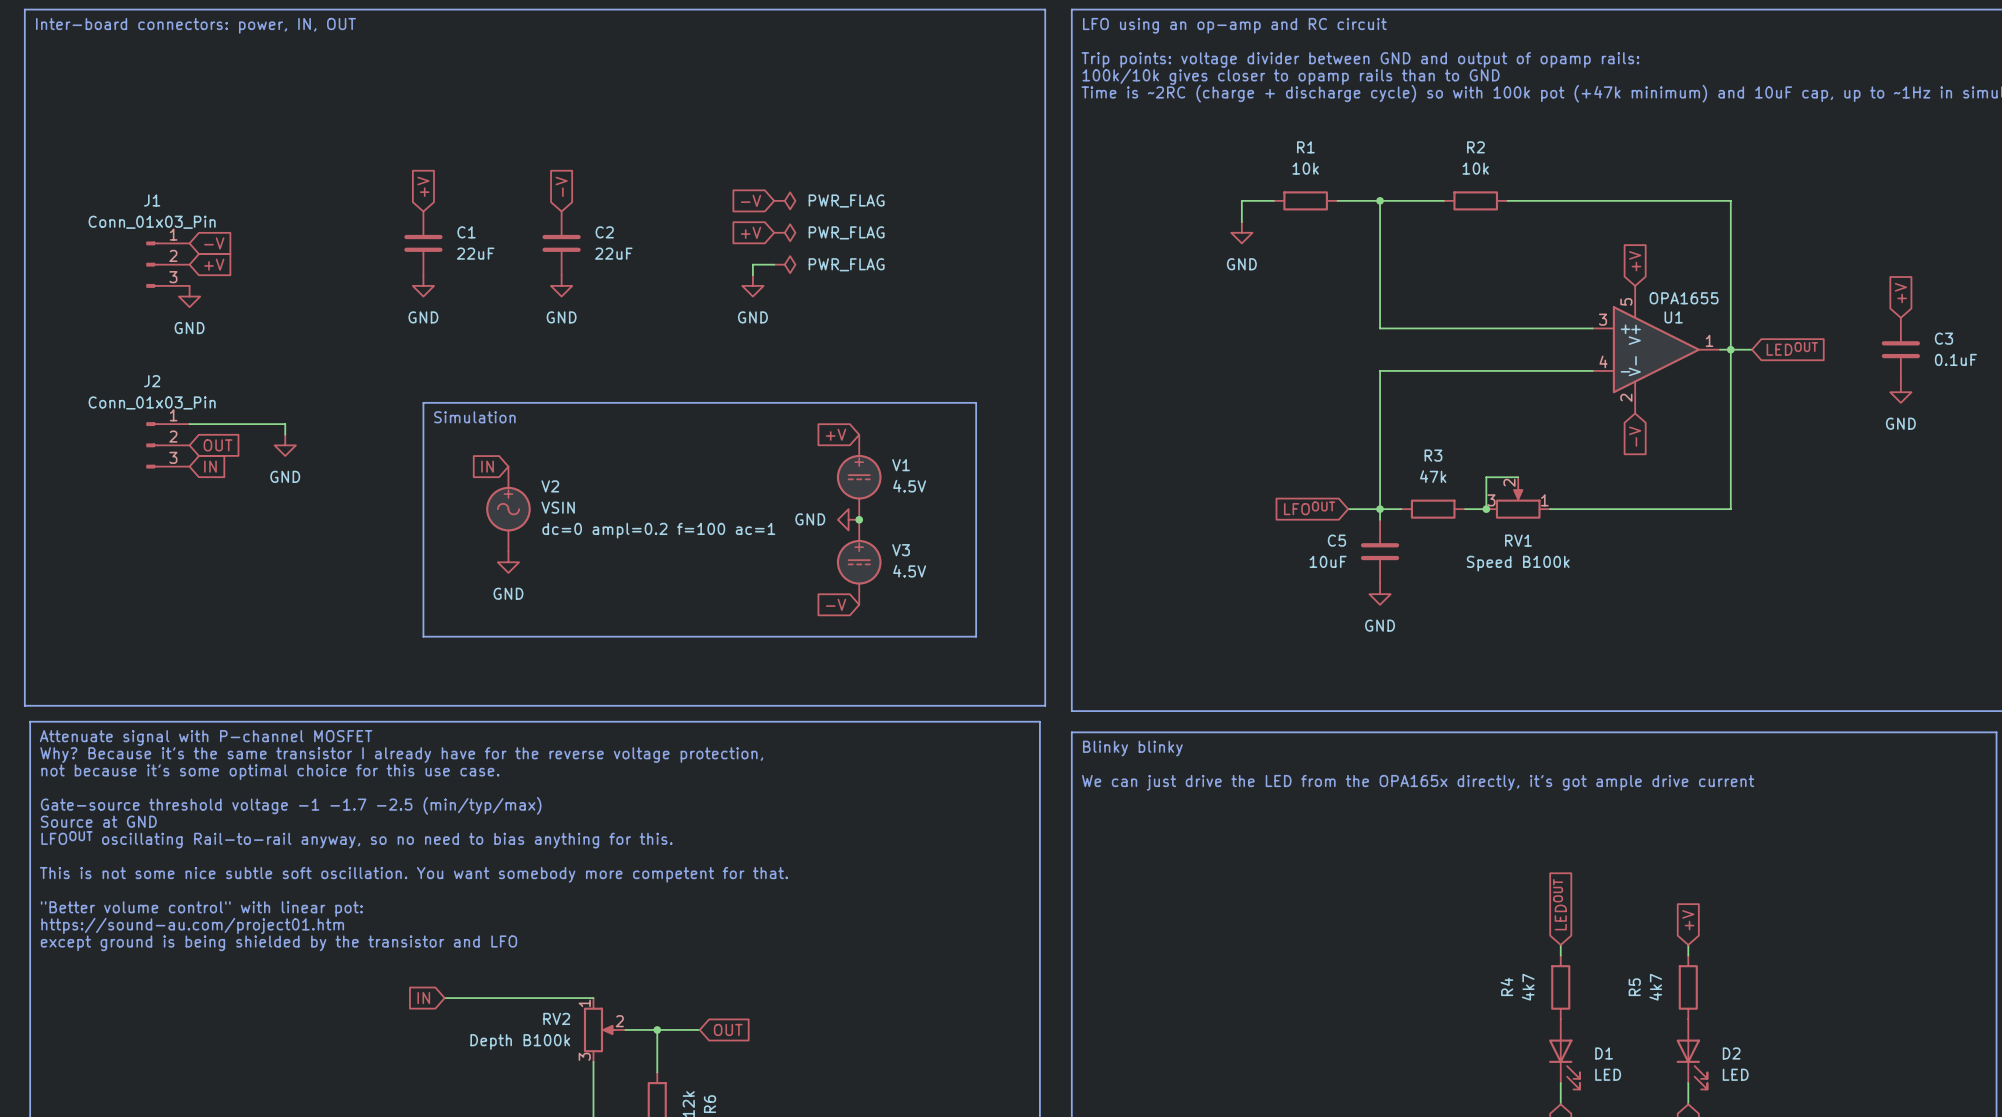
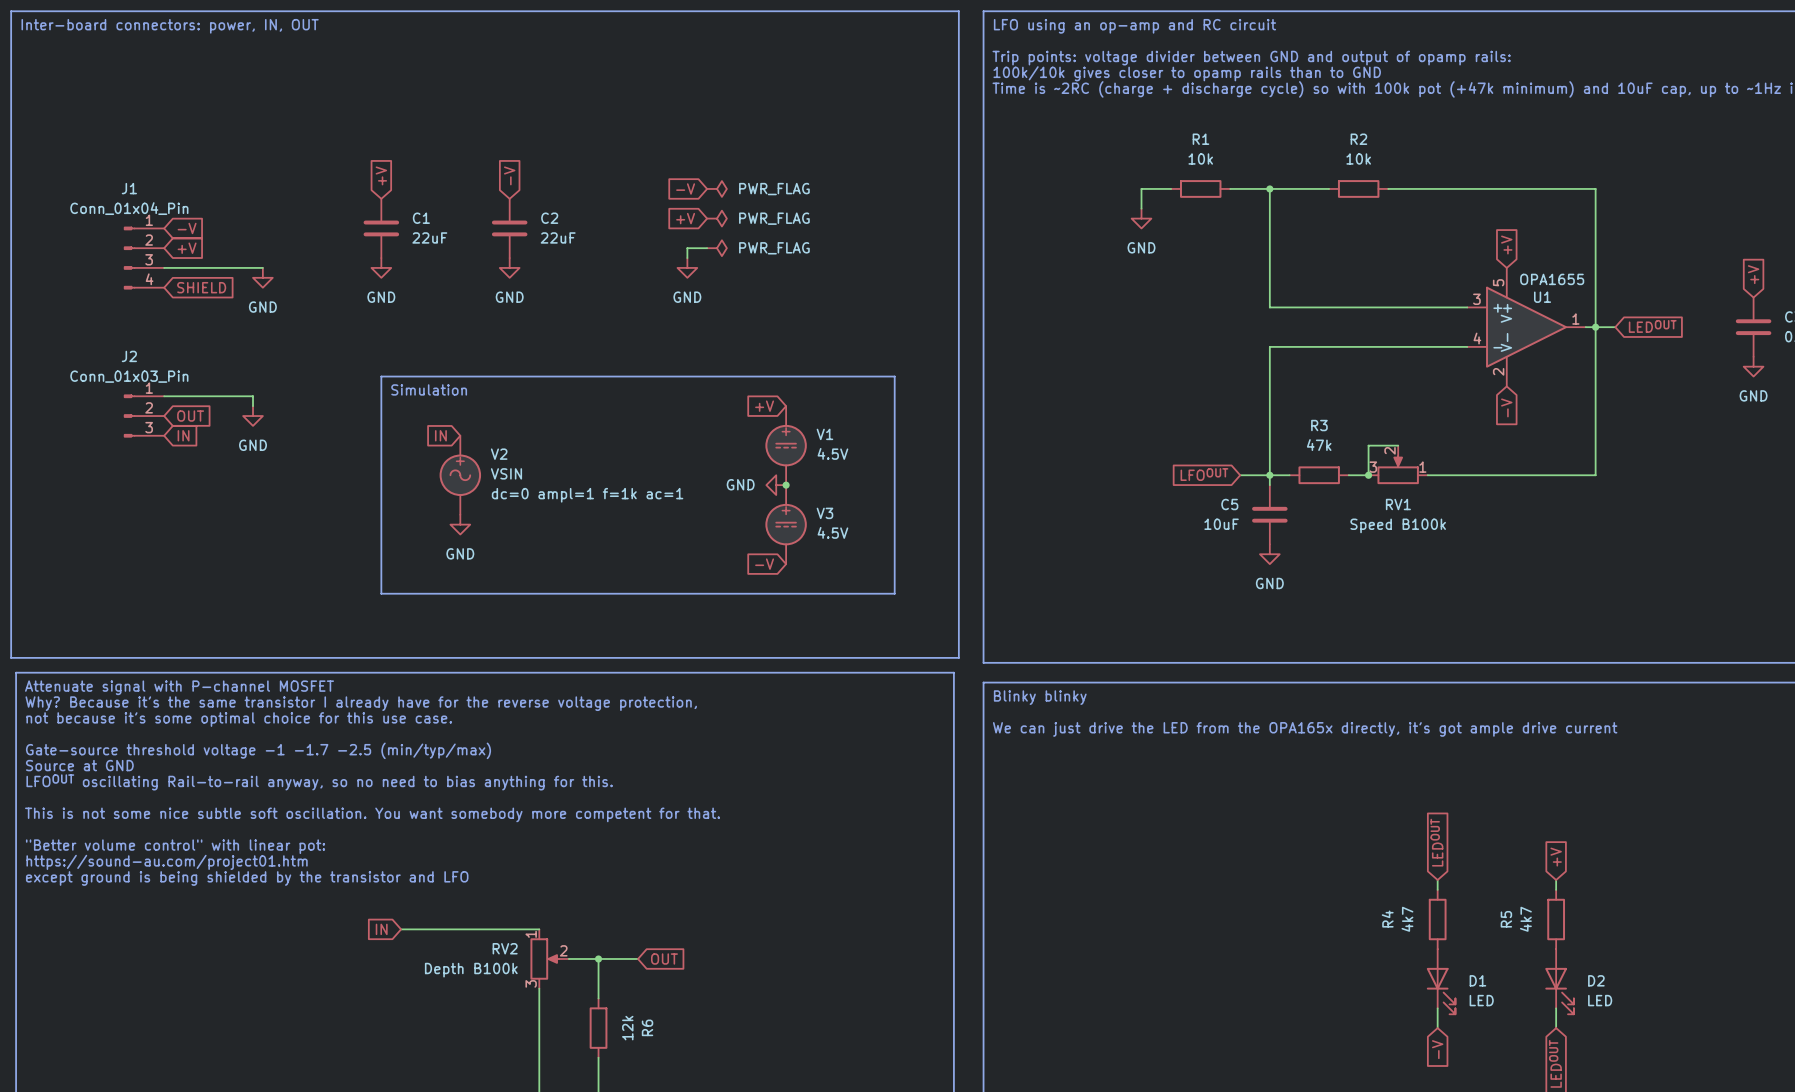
J1 value: Conn_01x03_Pin (152, 222) -> Conn_01x04_Pin (129, 208)
J1 symbol: [146, 241, 190, 288] -> [124, 226, 165, 290]
wire: none -> (164, 267) (262, 267)
power symbol position: GND (189, 296) -> GND (262, 277)
global label: none -> SHIELD (201, 287)
V2 text: dc=0 ampl=0.2 f=100 ac=1 (658, 530) -> dc=0 ampl=1 f=1k ac=1 (587, 495)

